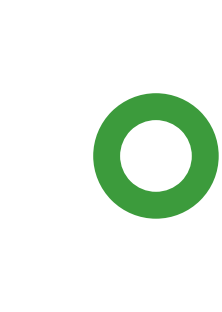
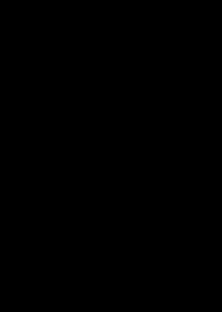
part: (155, 155) -> none

